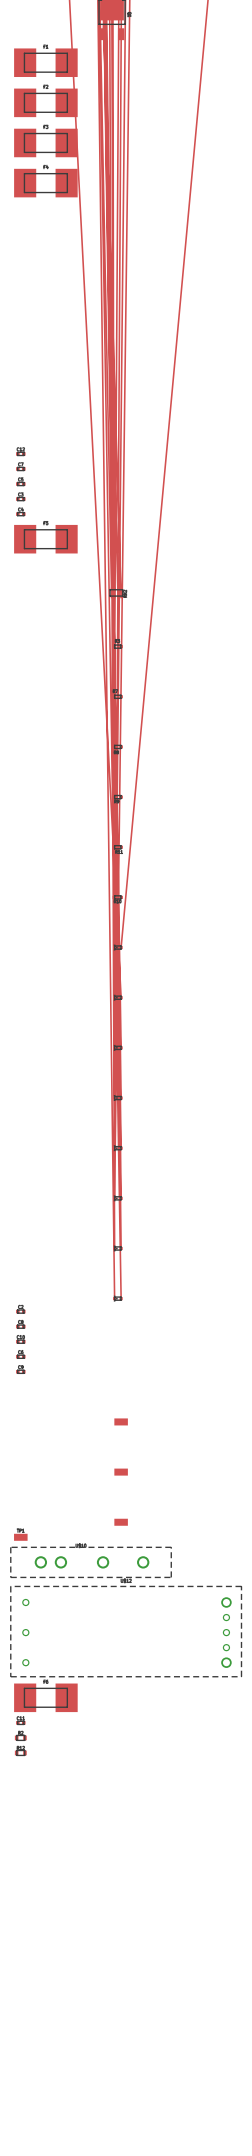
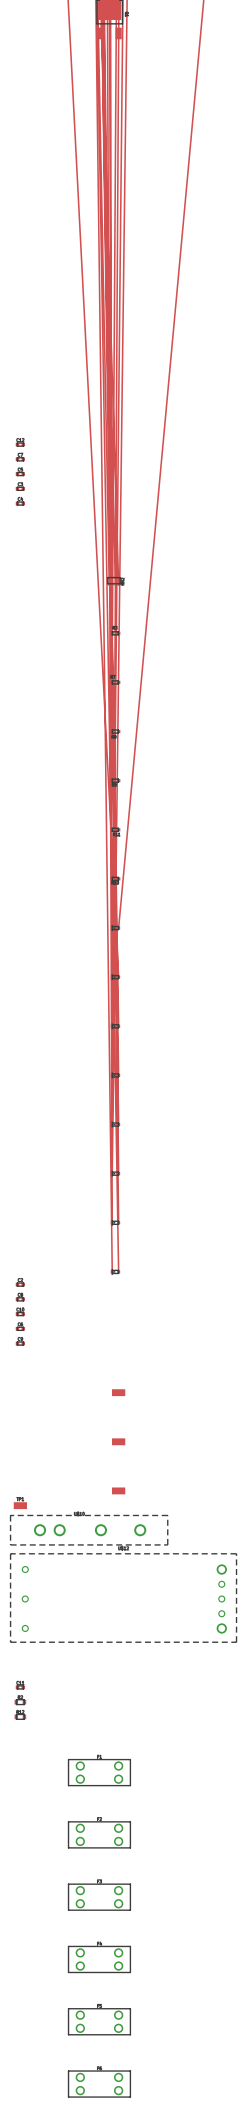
part footprint: [14, 48, 78, 78] -> [68, 1759, 131, 1786]
part footprint: [14, 88, 78, 118] -> [68, 1821, 131, 1849]
part footprint: [14, 128, 78, 158] -> [68, 1883, 131, 1911]
part footprint: [14, 168, 78, 198] -> [68, 1946, 131, 1973]
part footprint: [14, 524, 78, 554] -> [68, 2008, 131, 2036]
part footprint: [14, 1683, 78, 1713] -> [68, 2070, 131, 2098]

